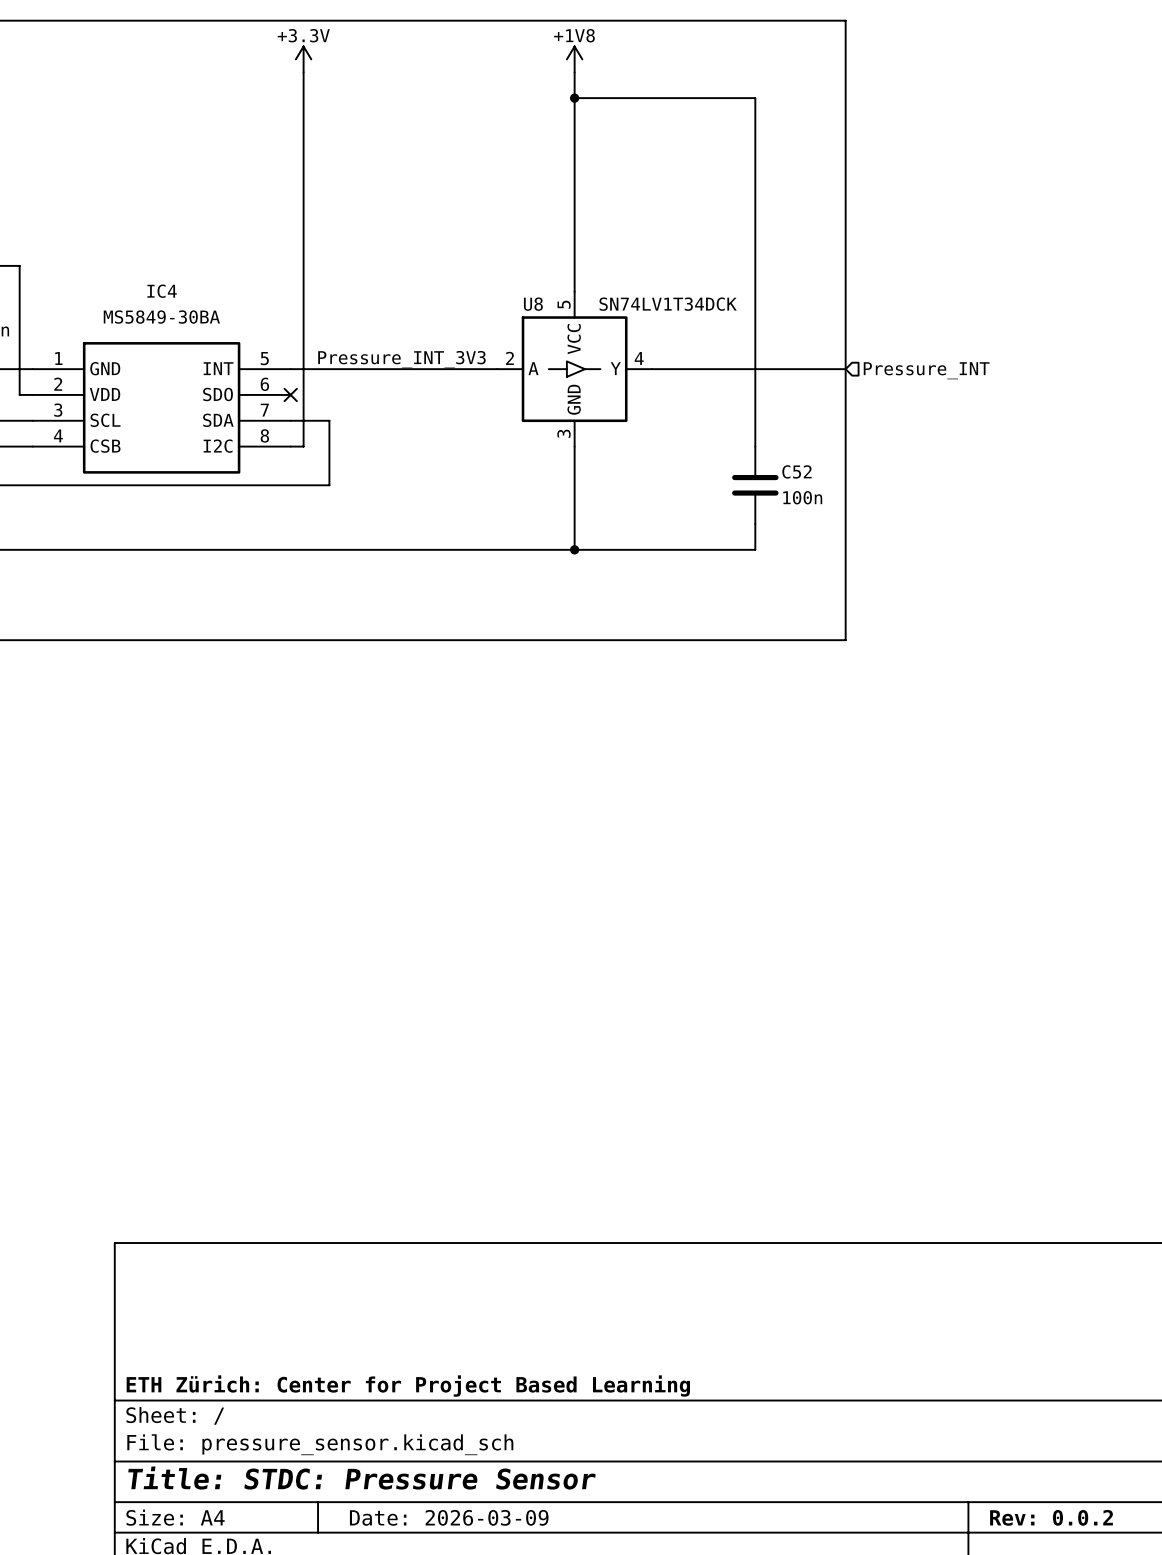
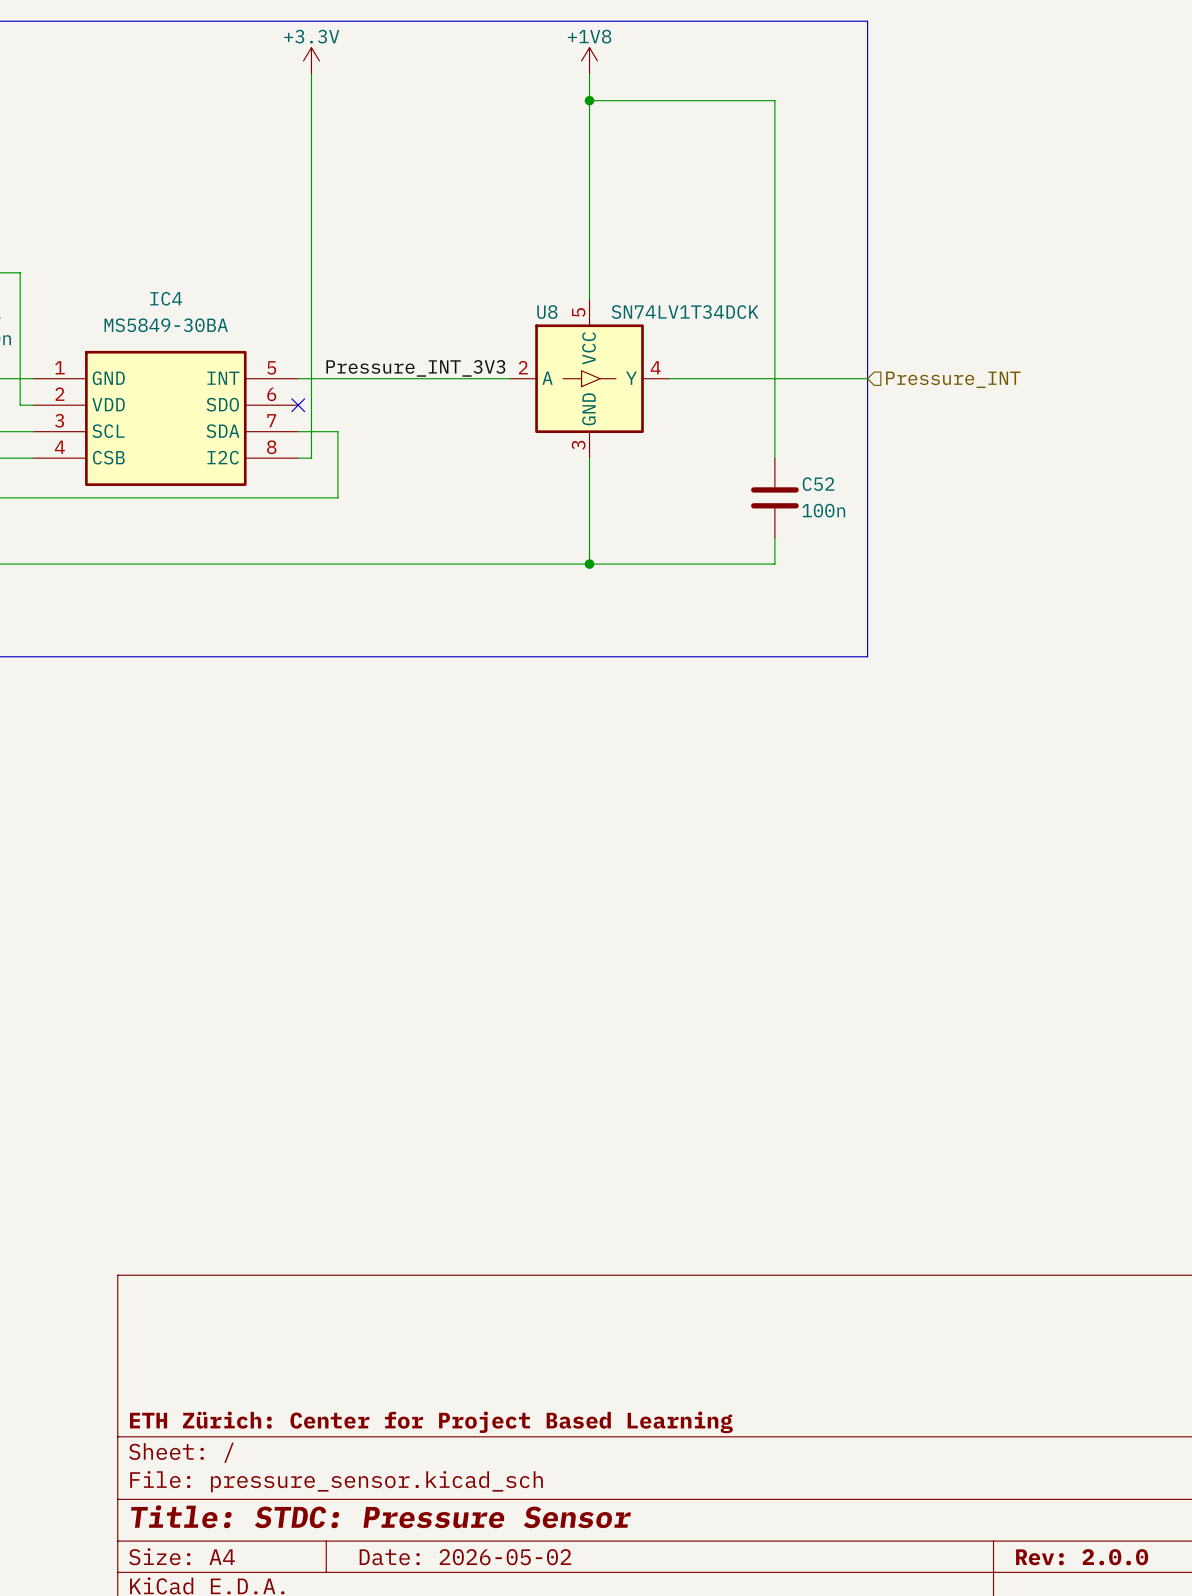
title block: Date: 2026-03-09 (449, 1517) -> Date: 2026-05-02 (465, 1557)
title block: Rev: 0.0.2 (1051, 1517) -> Rev: 2.0.0 (1082, 1557)

